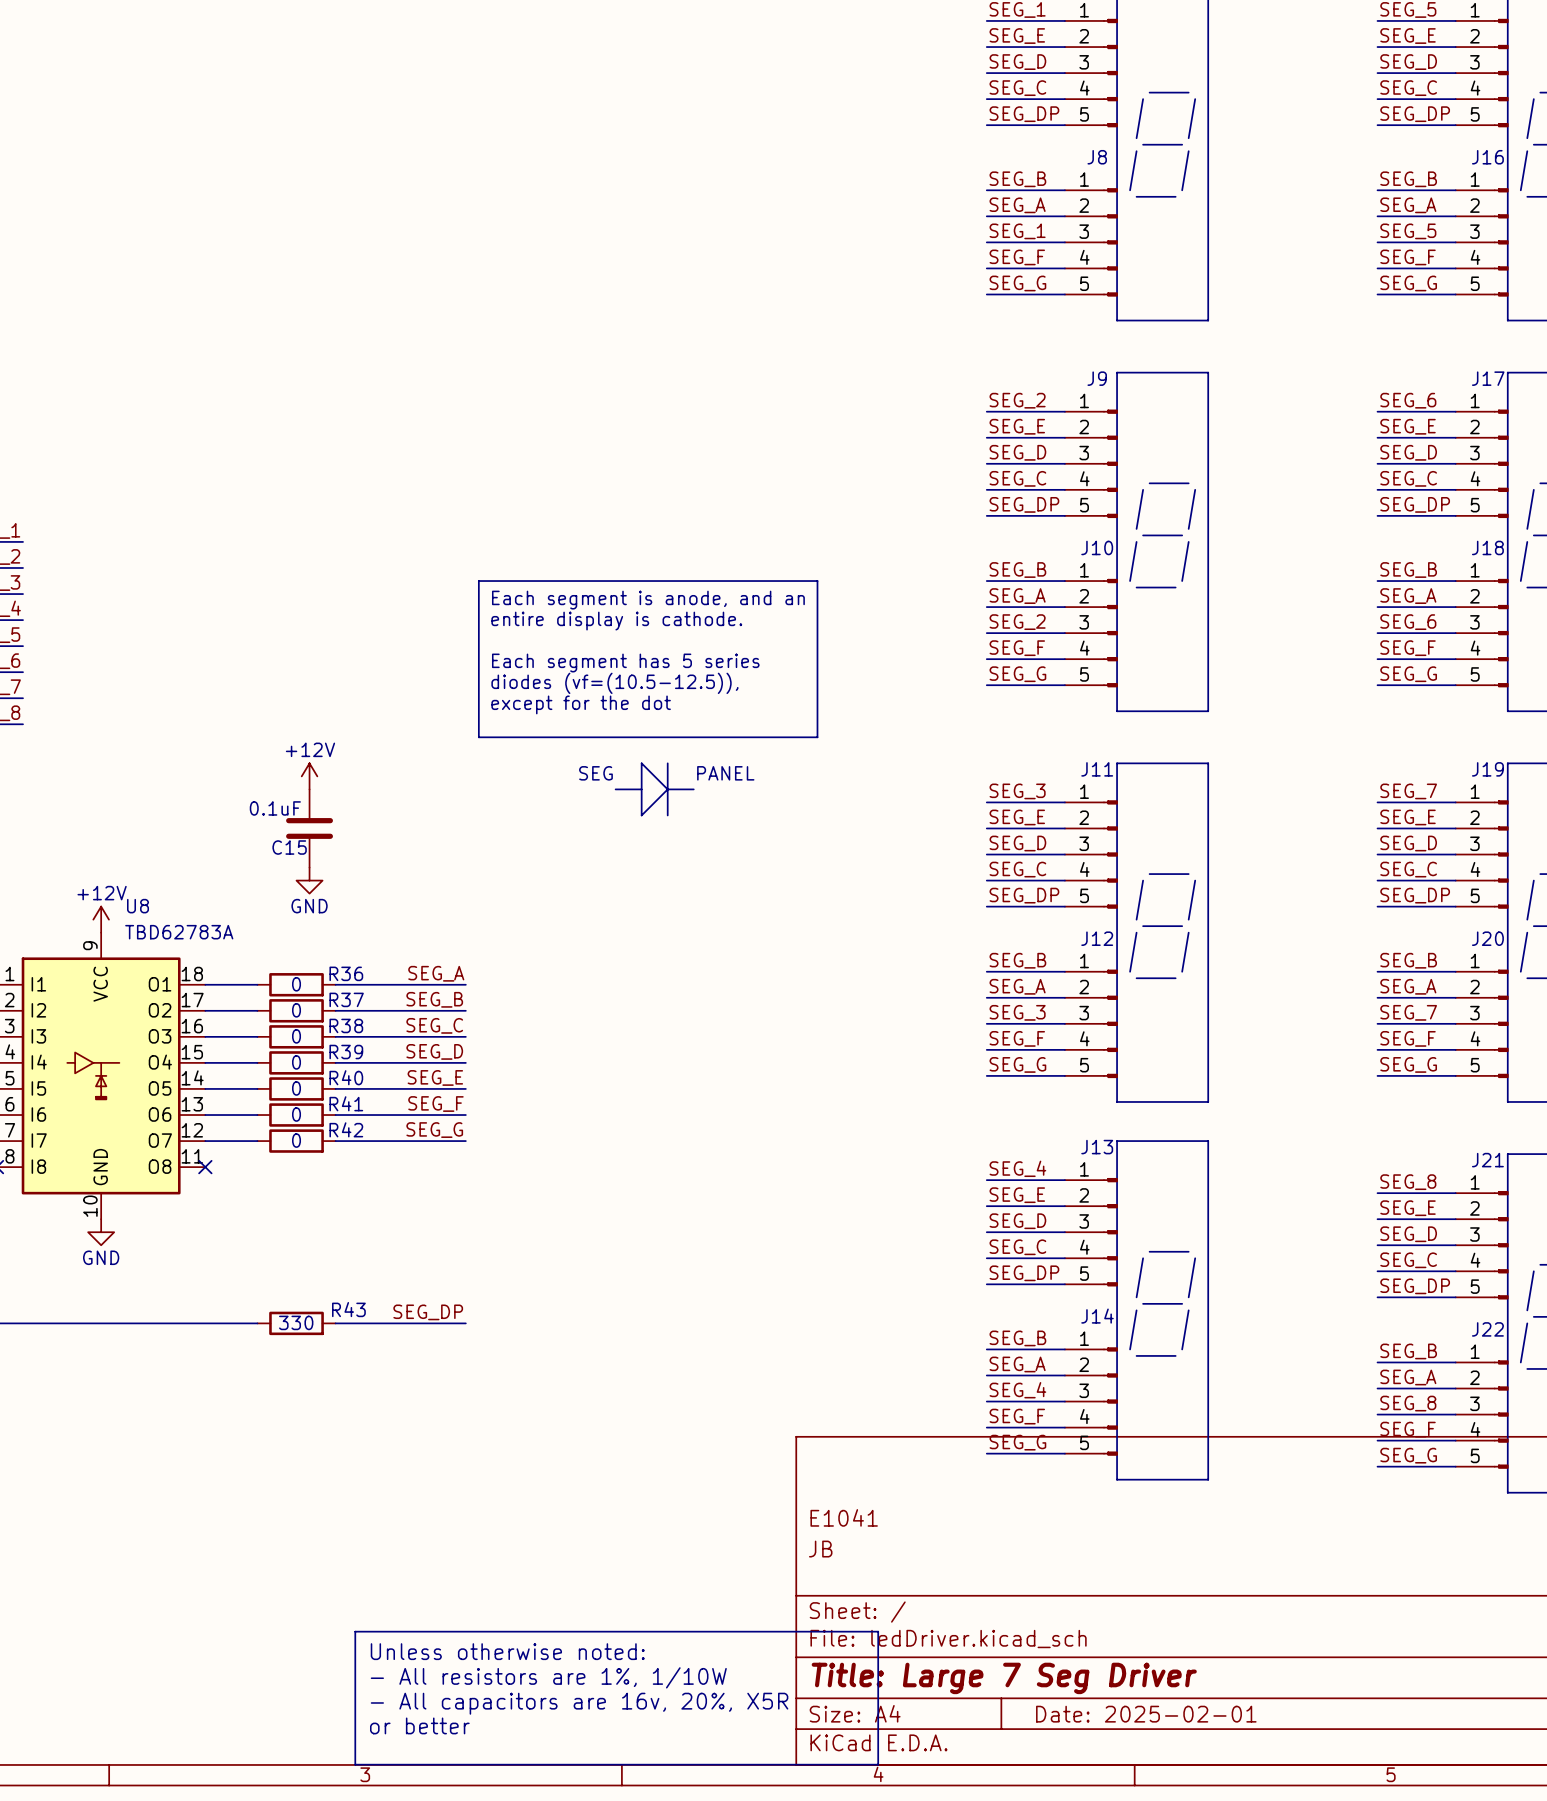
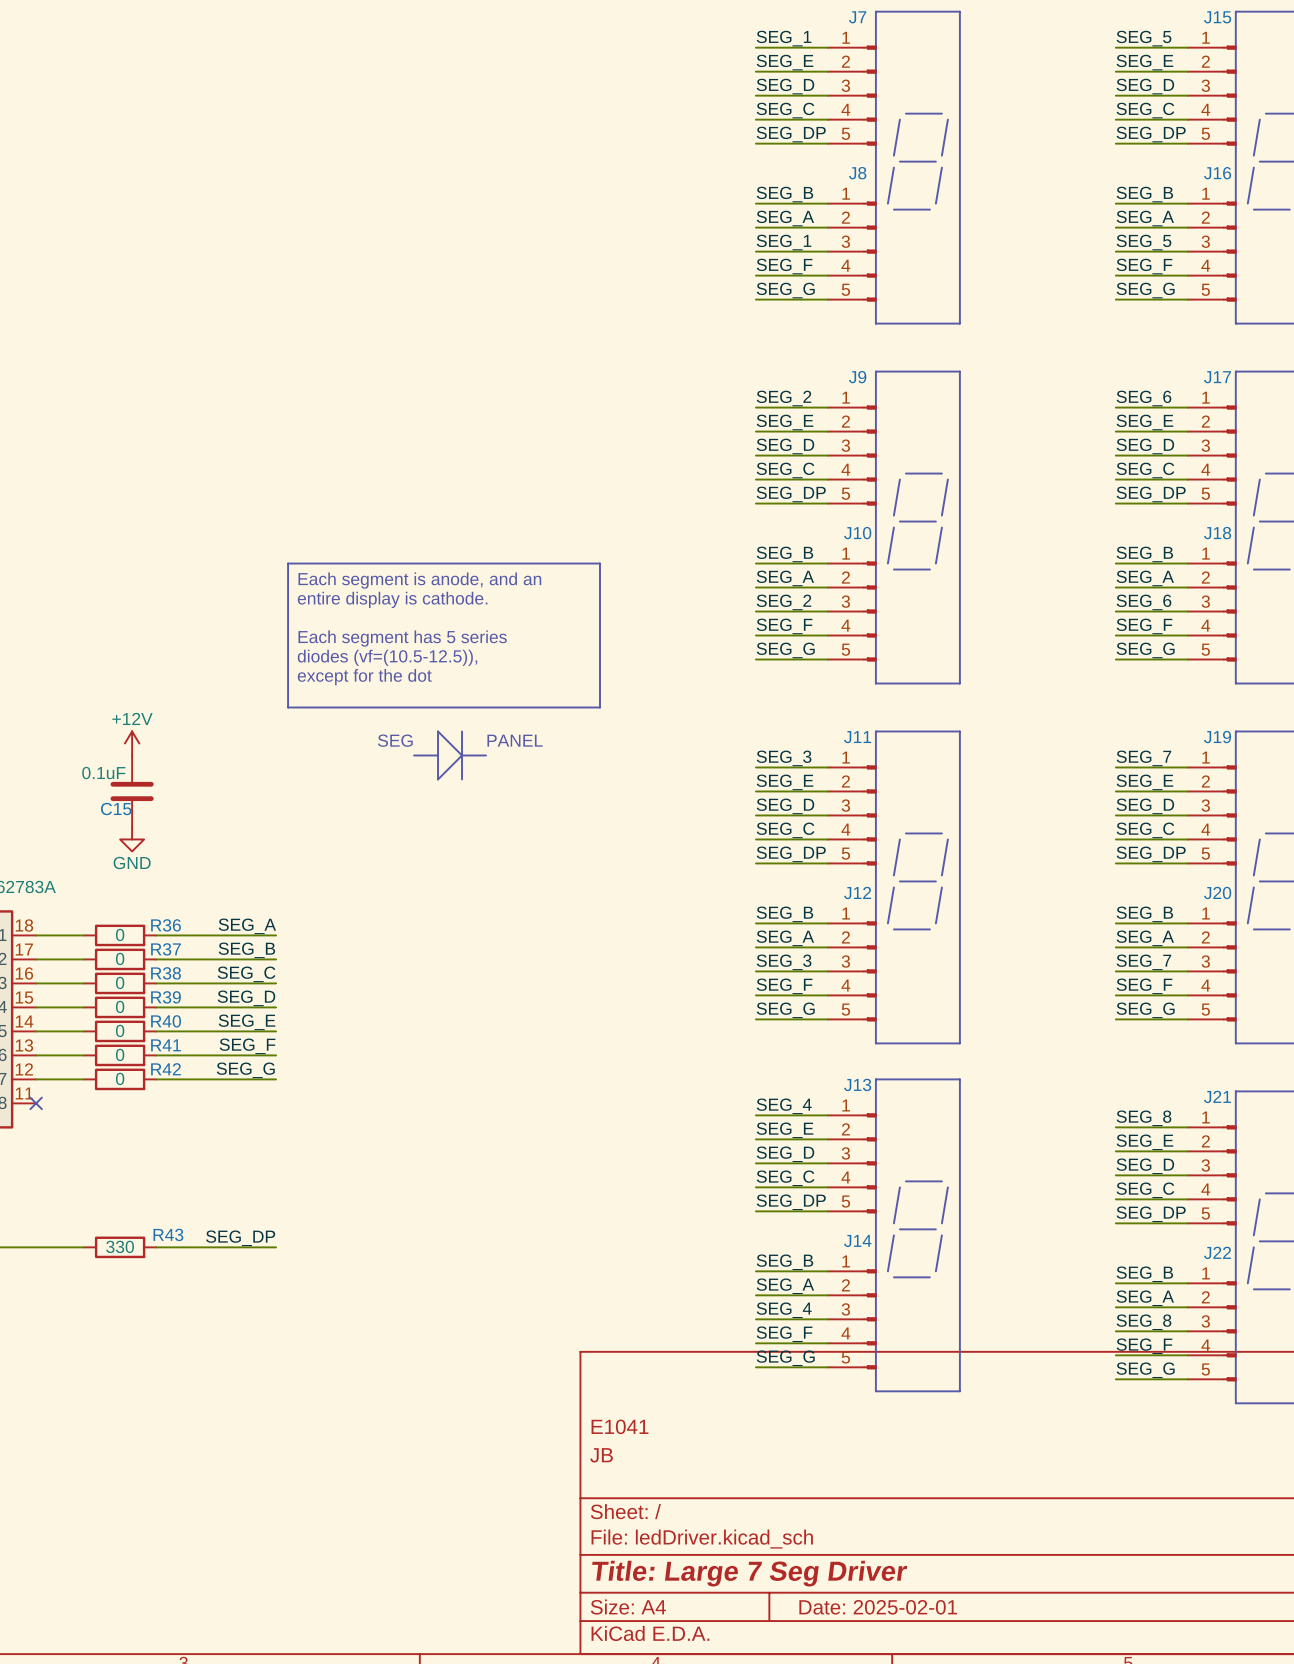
line: (355, 1631) (878, 1631) (878, 1764) (355, 1764) (355, 1631) -> none
text: Unless otherwise noted: (507, 1651) -> none
text: - All resistors are 1%, 1/10W (548, 1677) -> none
text: - All capacitors are 16v, 20%, X5R (579, 1703) -> none
text: or better (419, 1725) -> none

